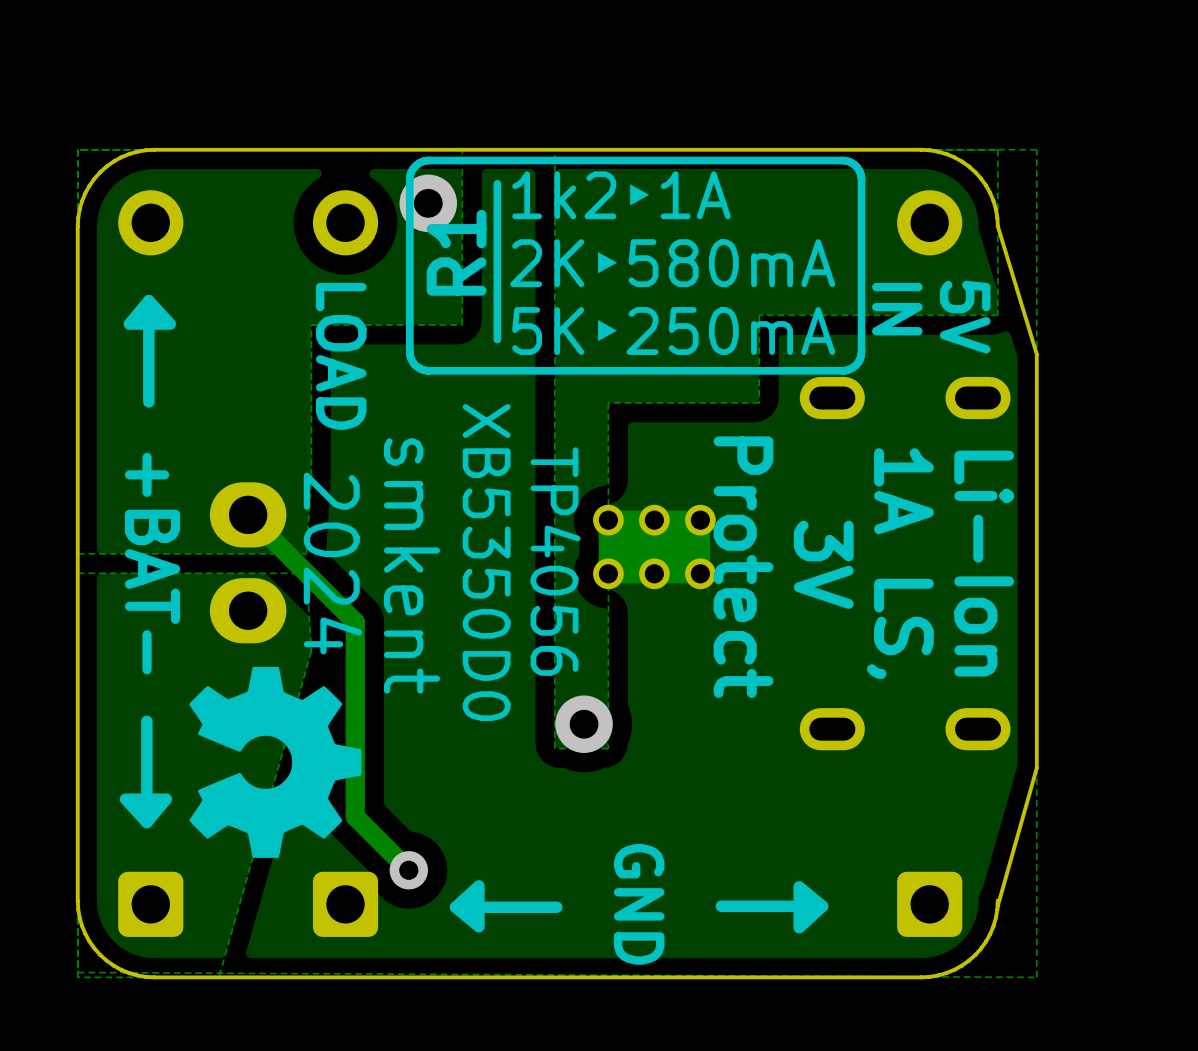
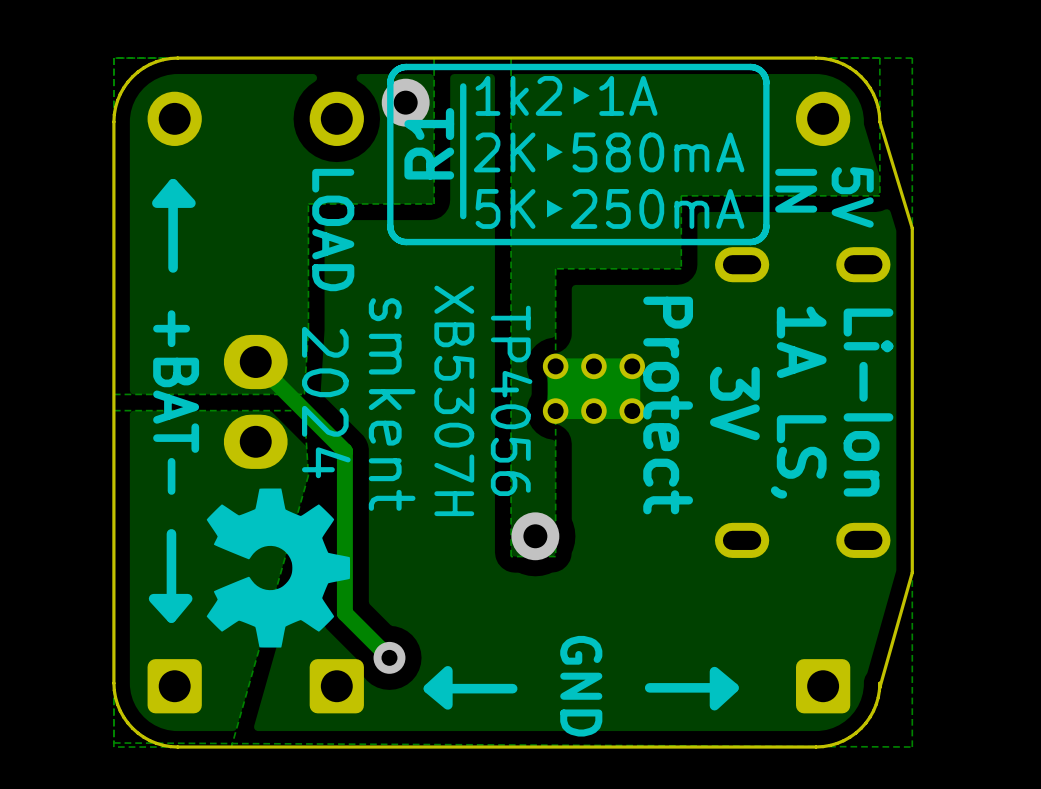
text: XB5350D0 (486, 562) -> XB5307H (454, 400)

